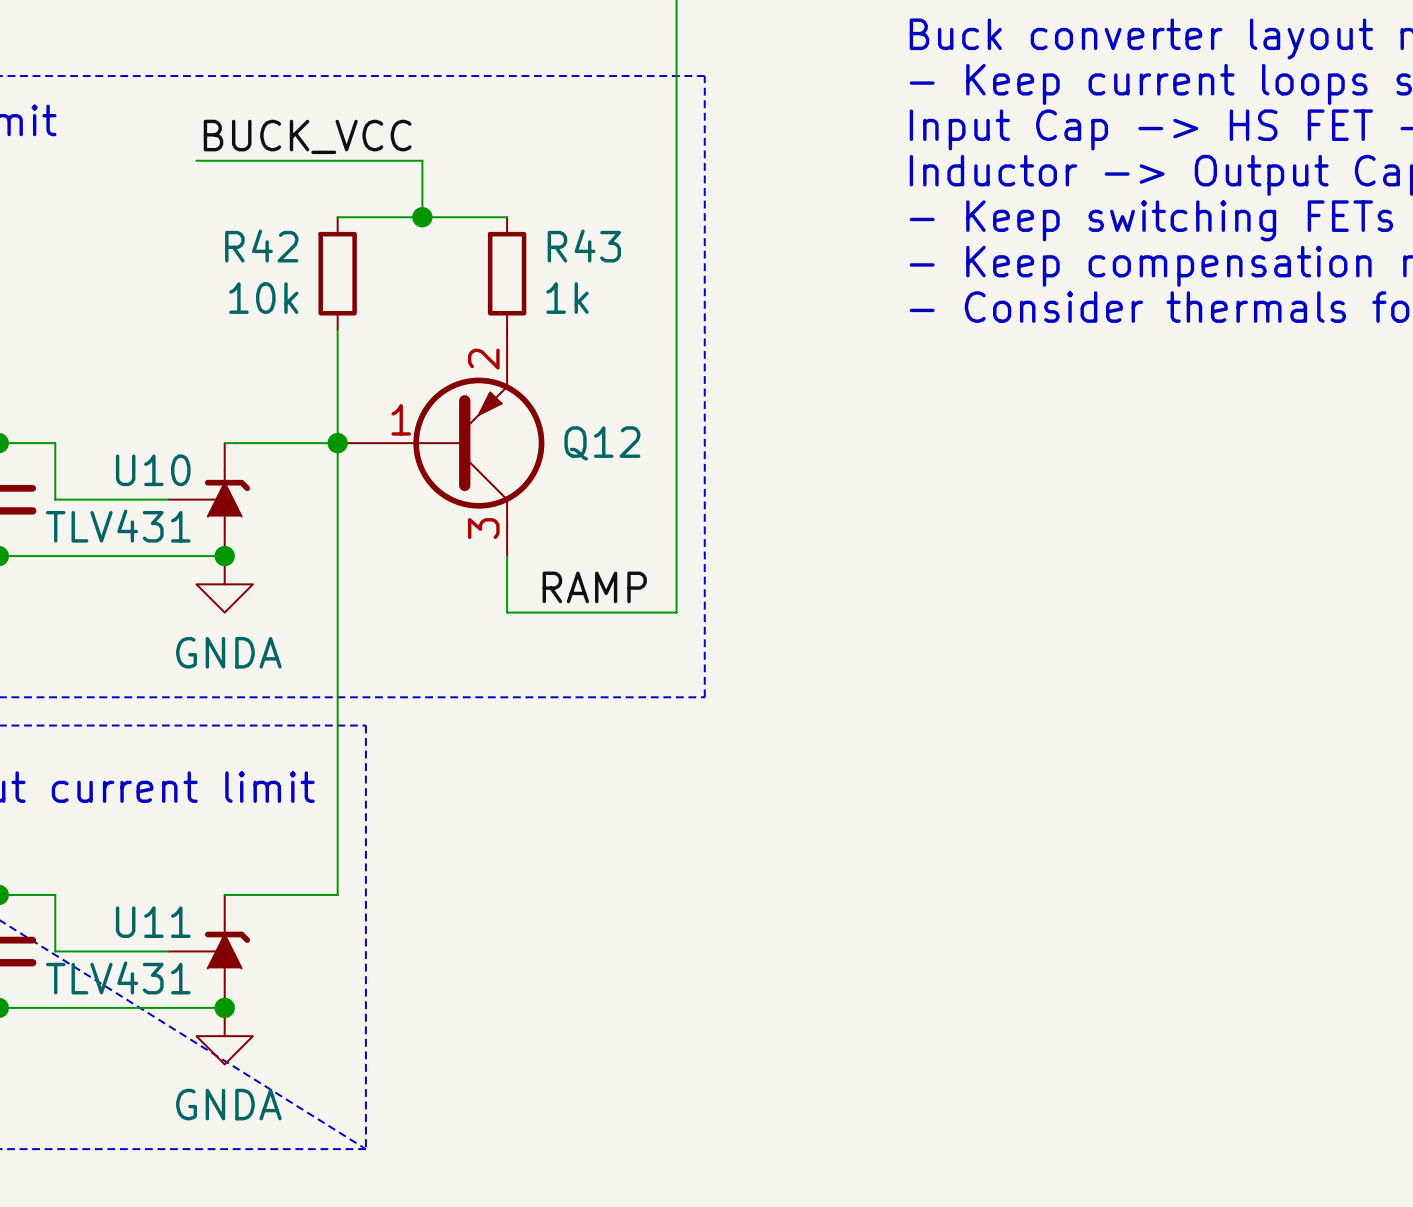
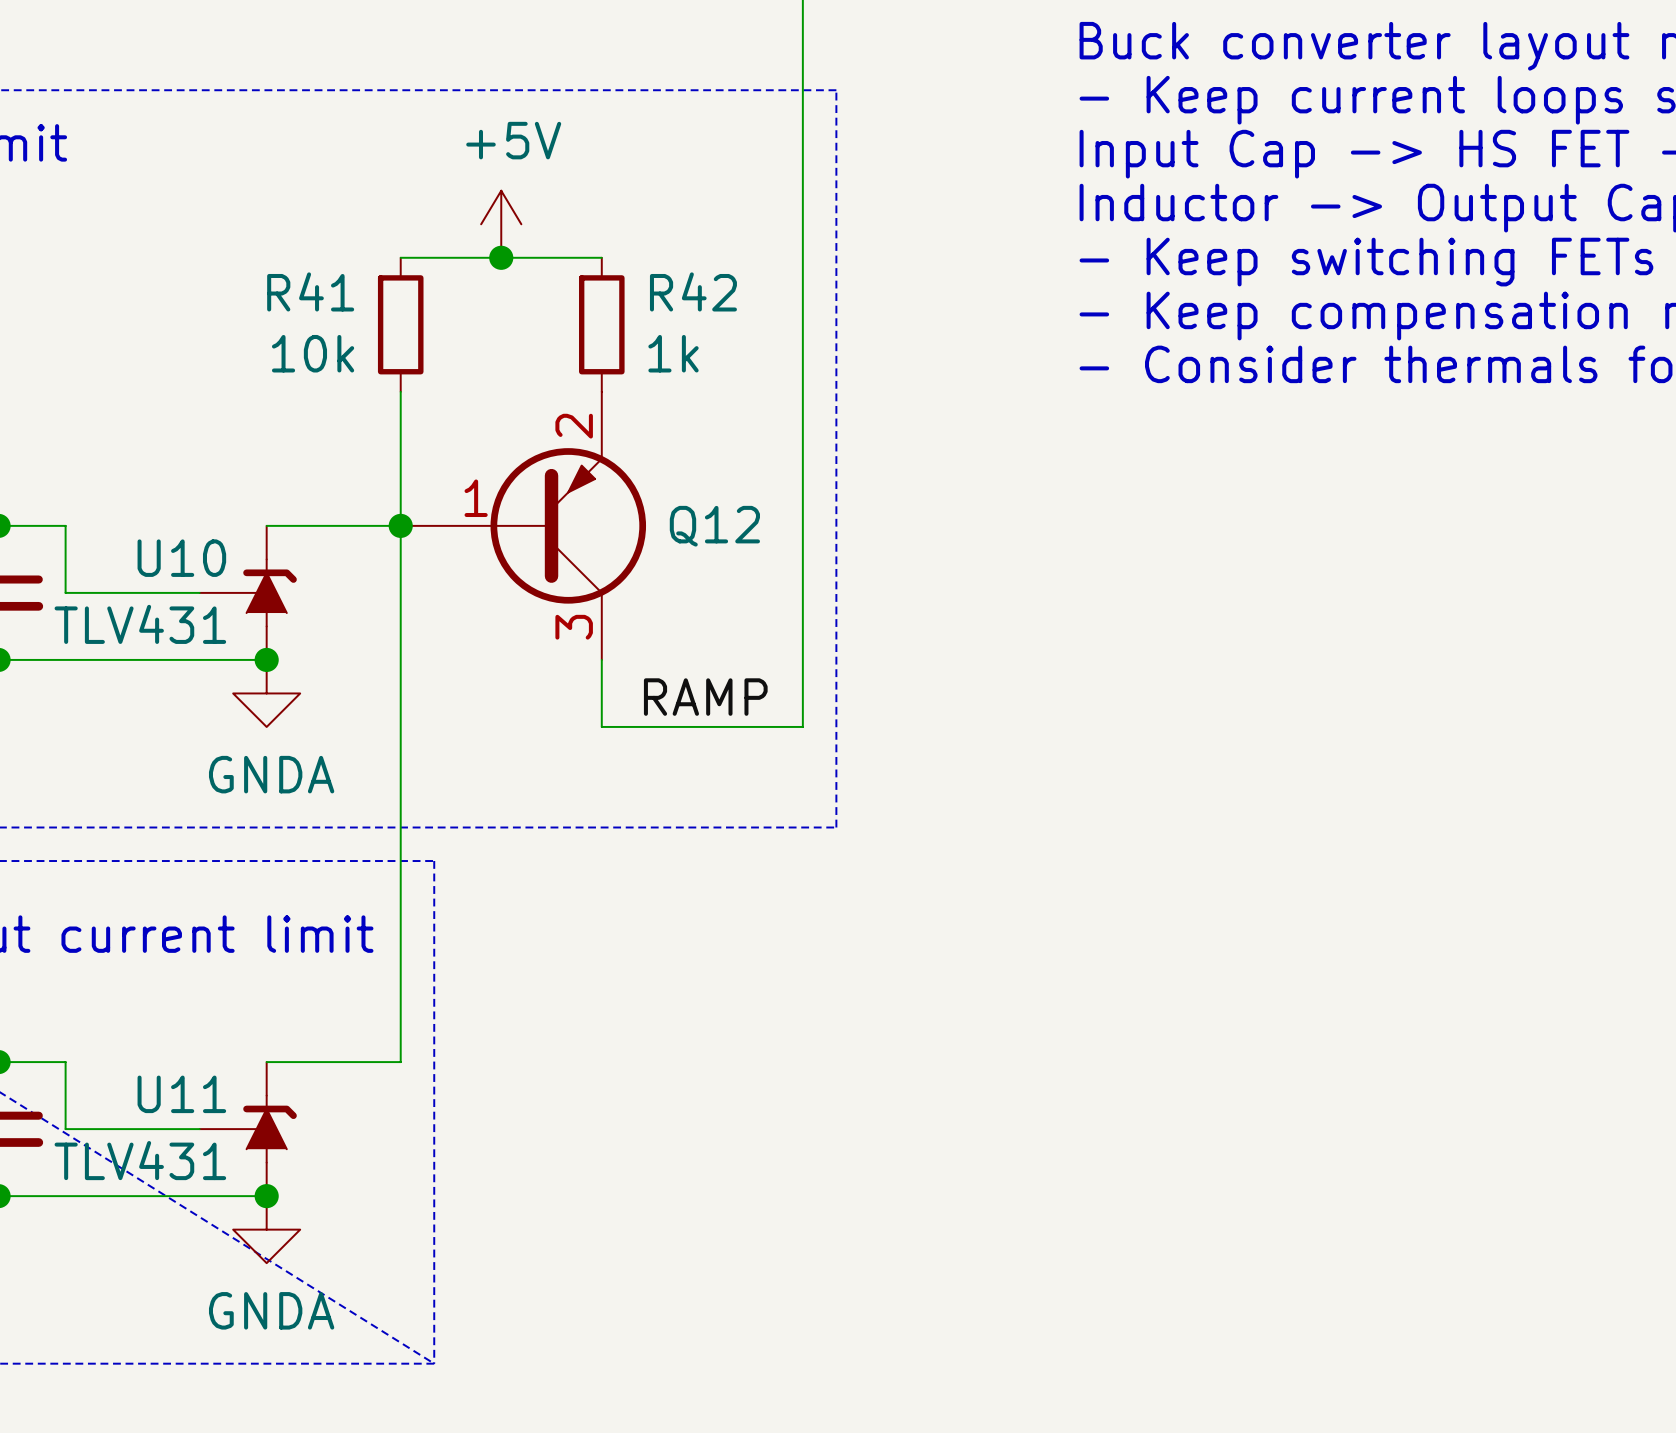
label: BUCK_VCC (307, 136) -> none
wire: (196, 160) (422, 160) (422, 217) -> none
power symbol: none -> +5V (501, 224)
R42 name: R42 (261, 246) -> R41 (310, 291)
R43 name: R43 (584, 246) -> R42 (693, 291)

